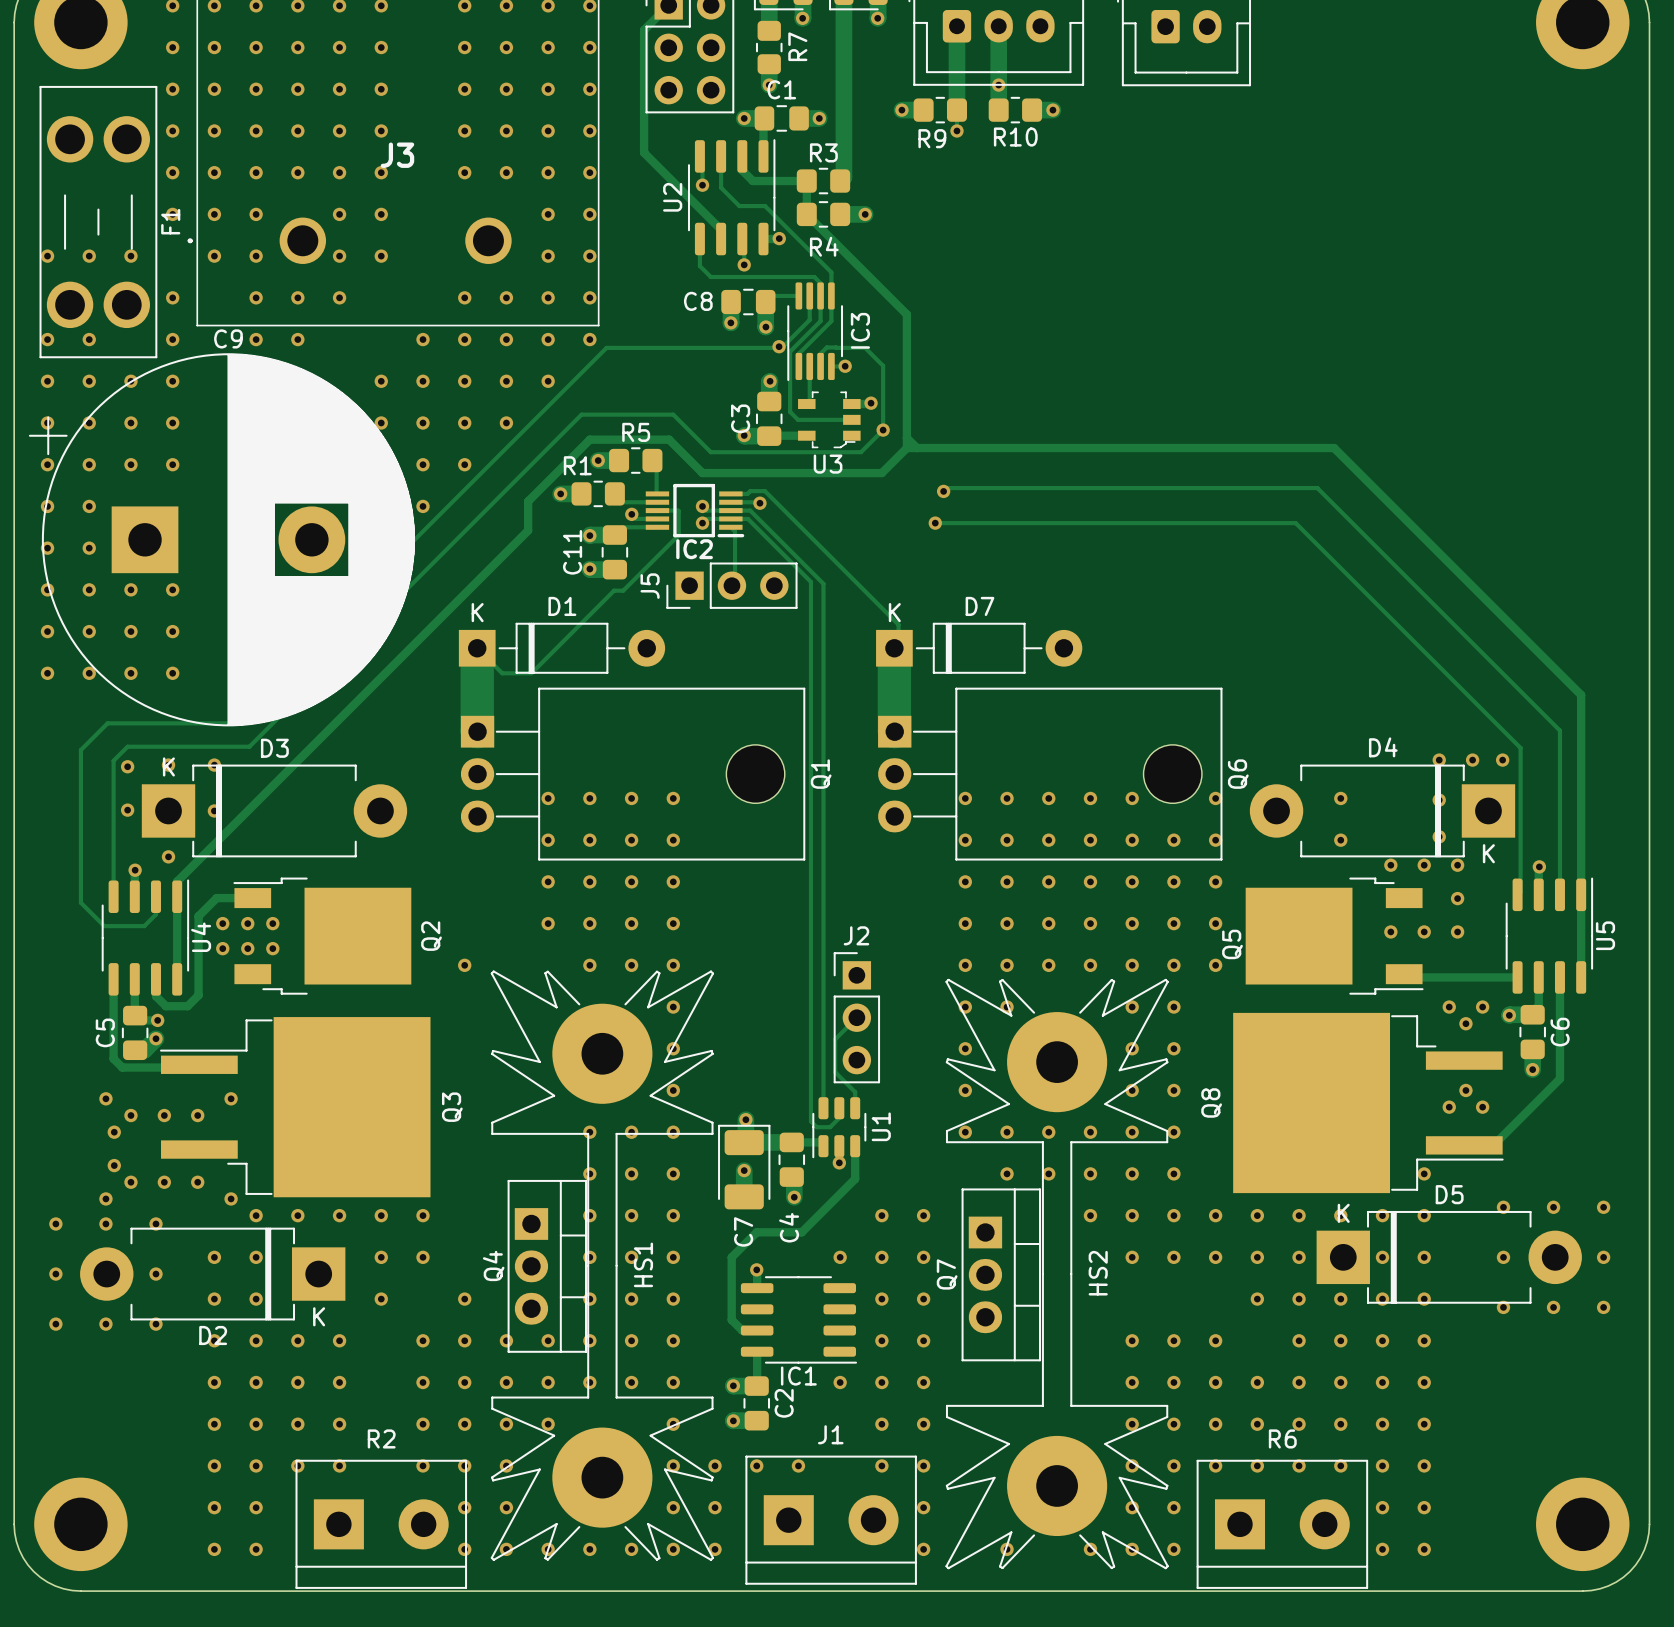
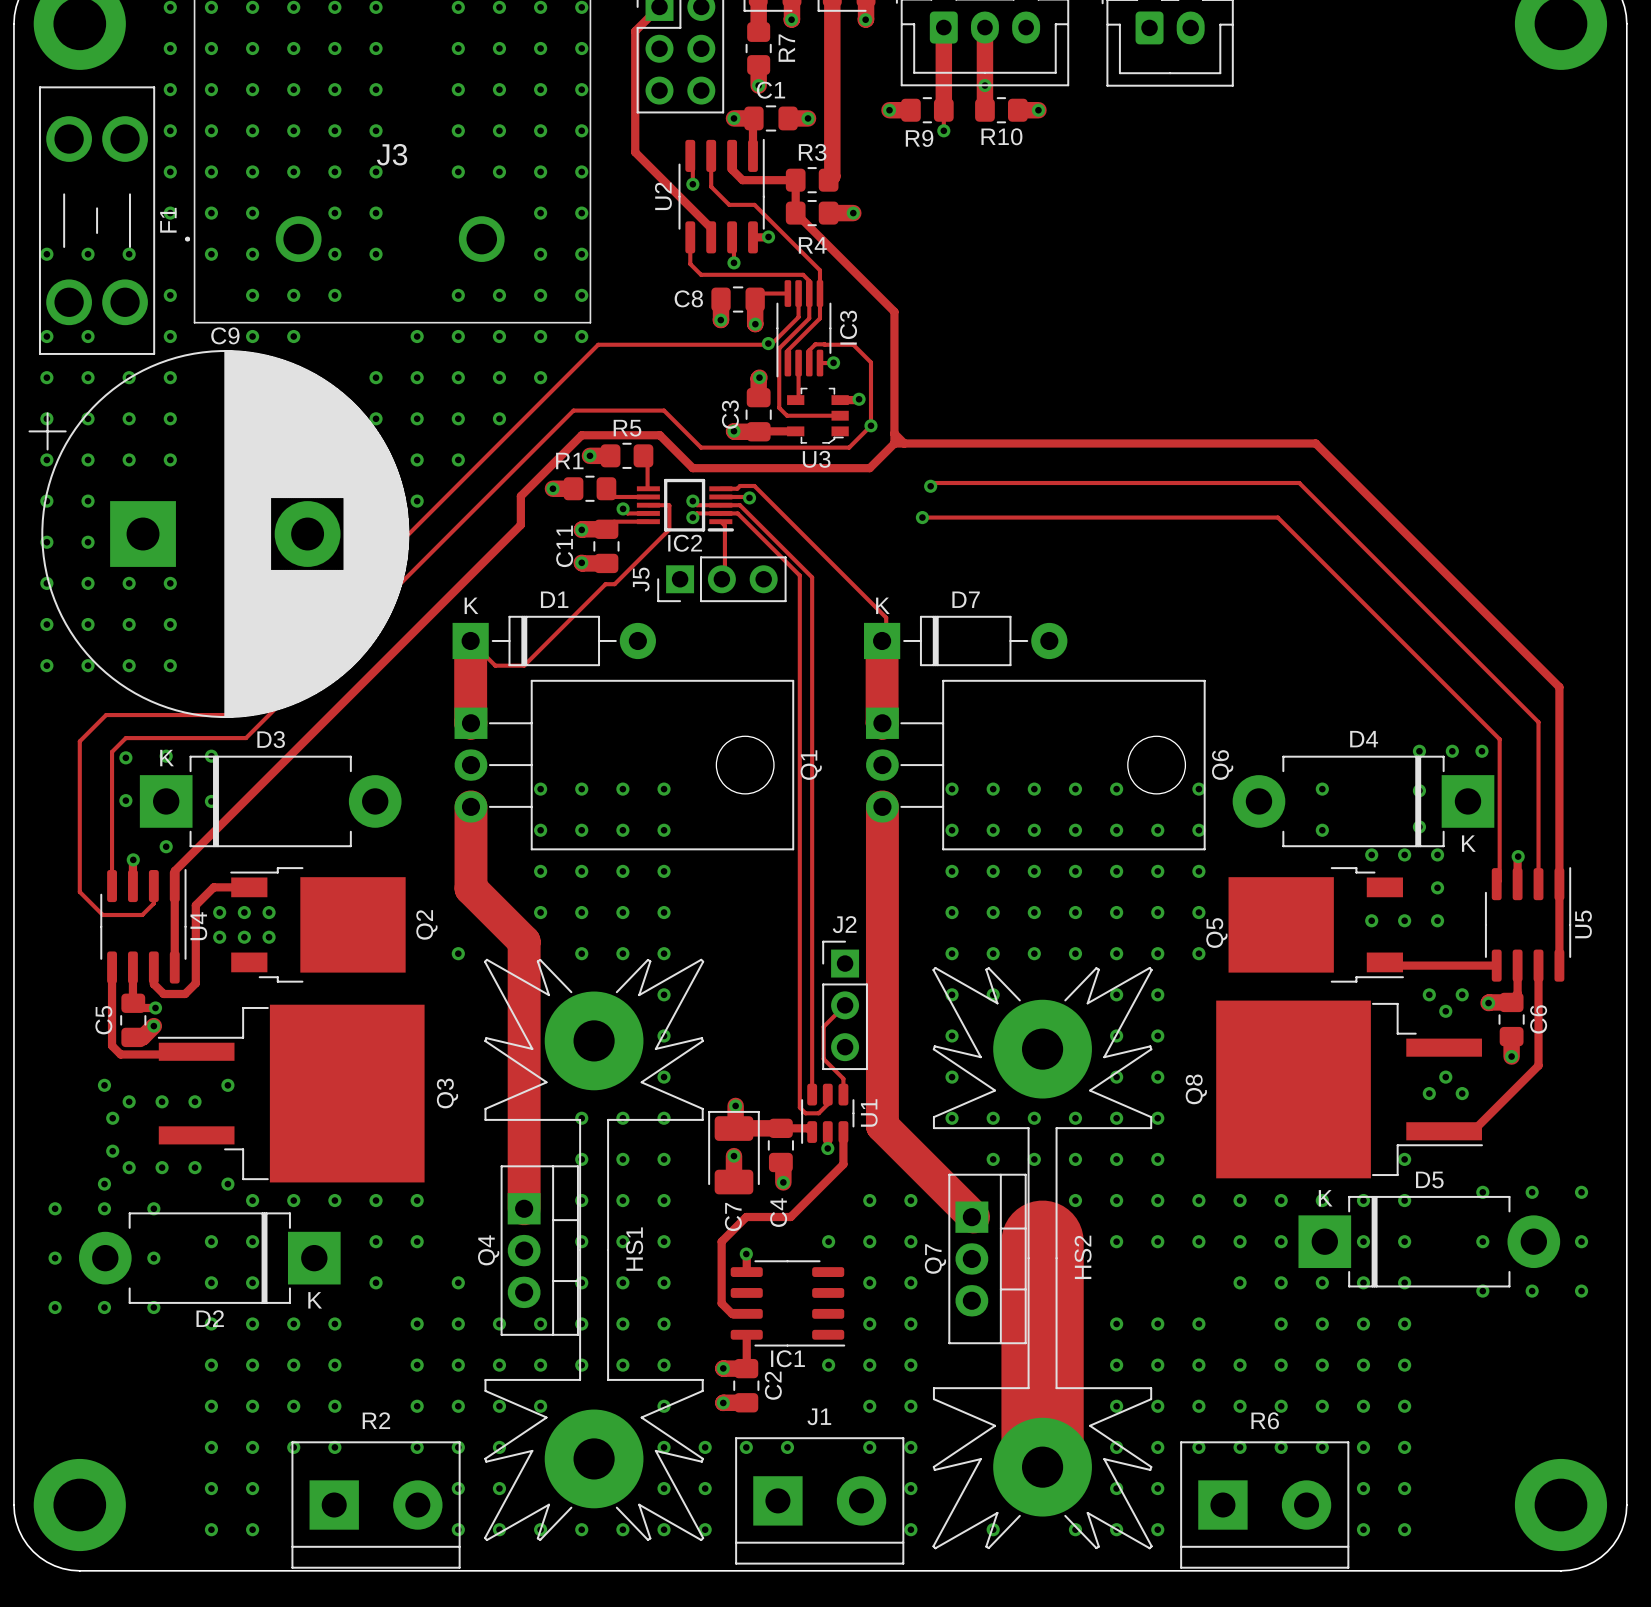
track: none -> (470, 806) (470, 888) (524, 941) (524, 1208)
track: none -> (882, 806) (882, 1125) (973, 1217)
track: none -> (1042, 1241) (1042, 1467)

